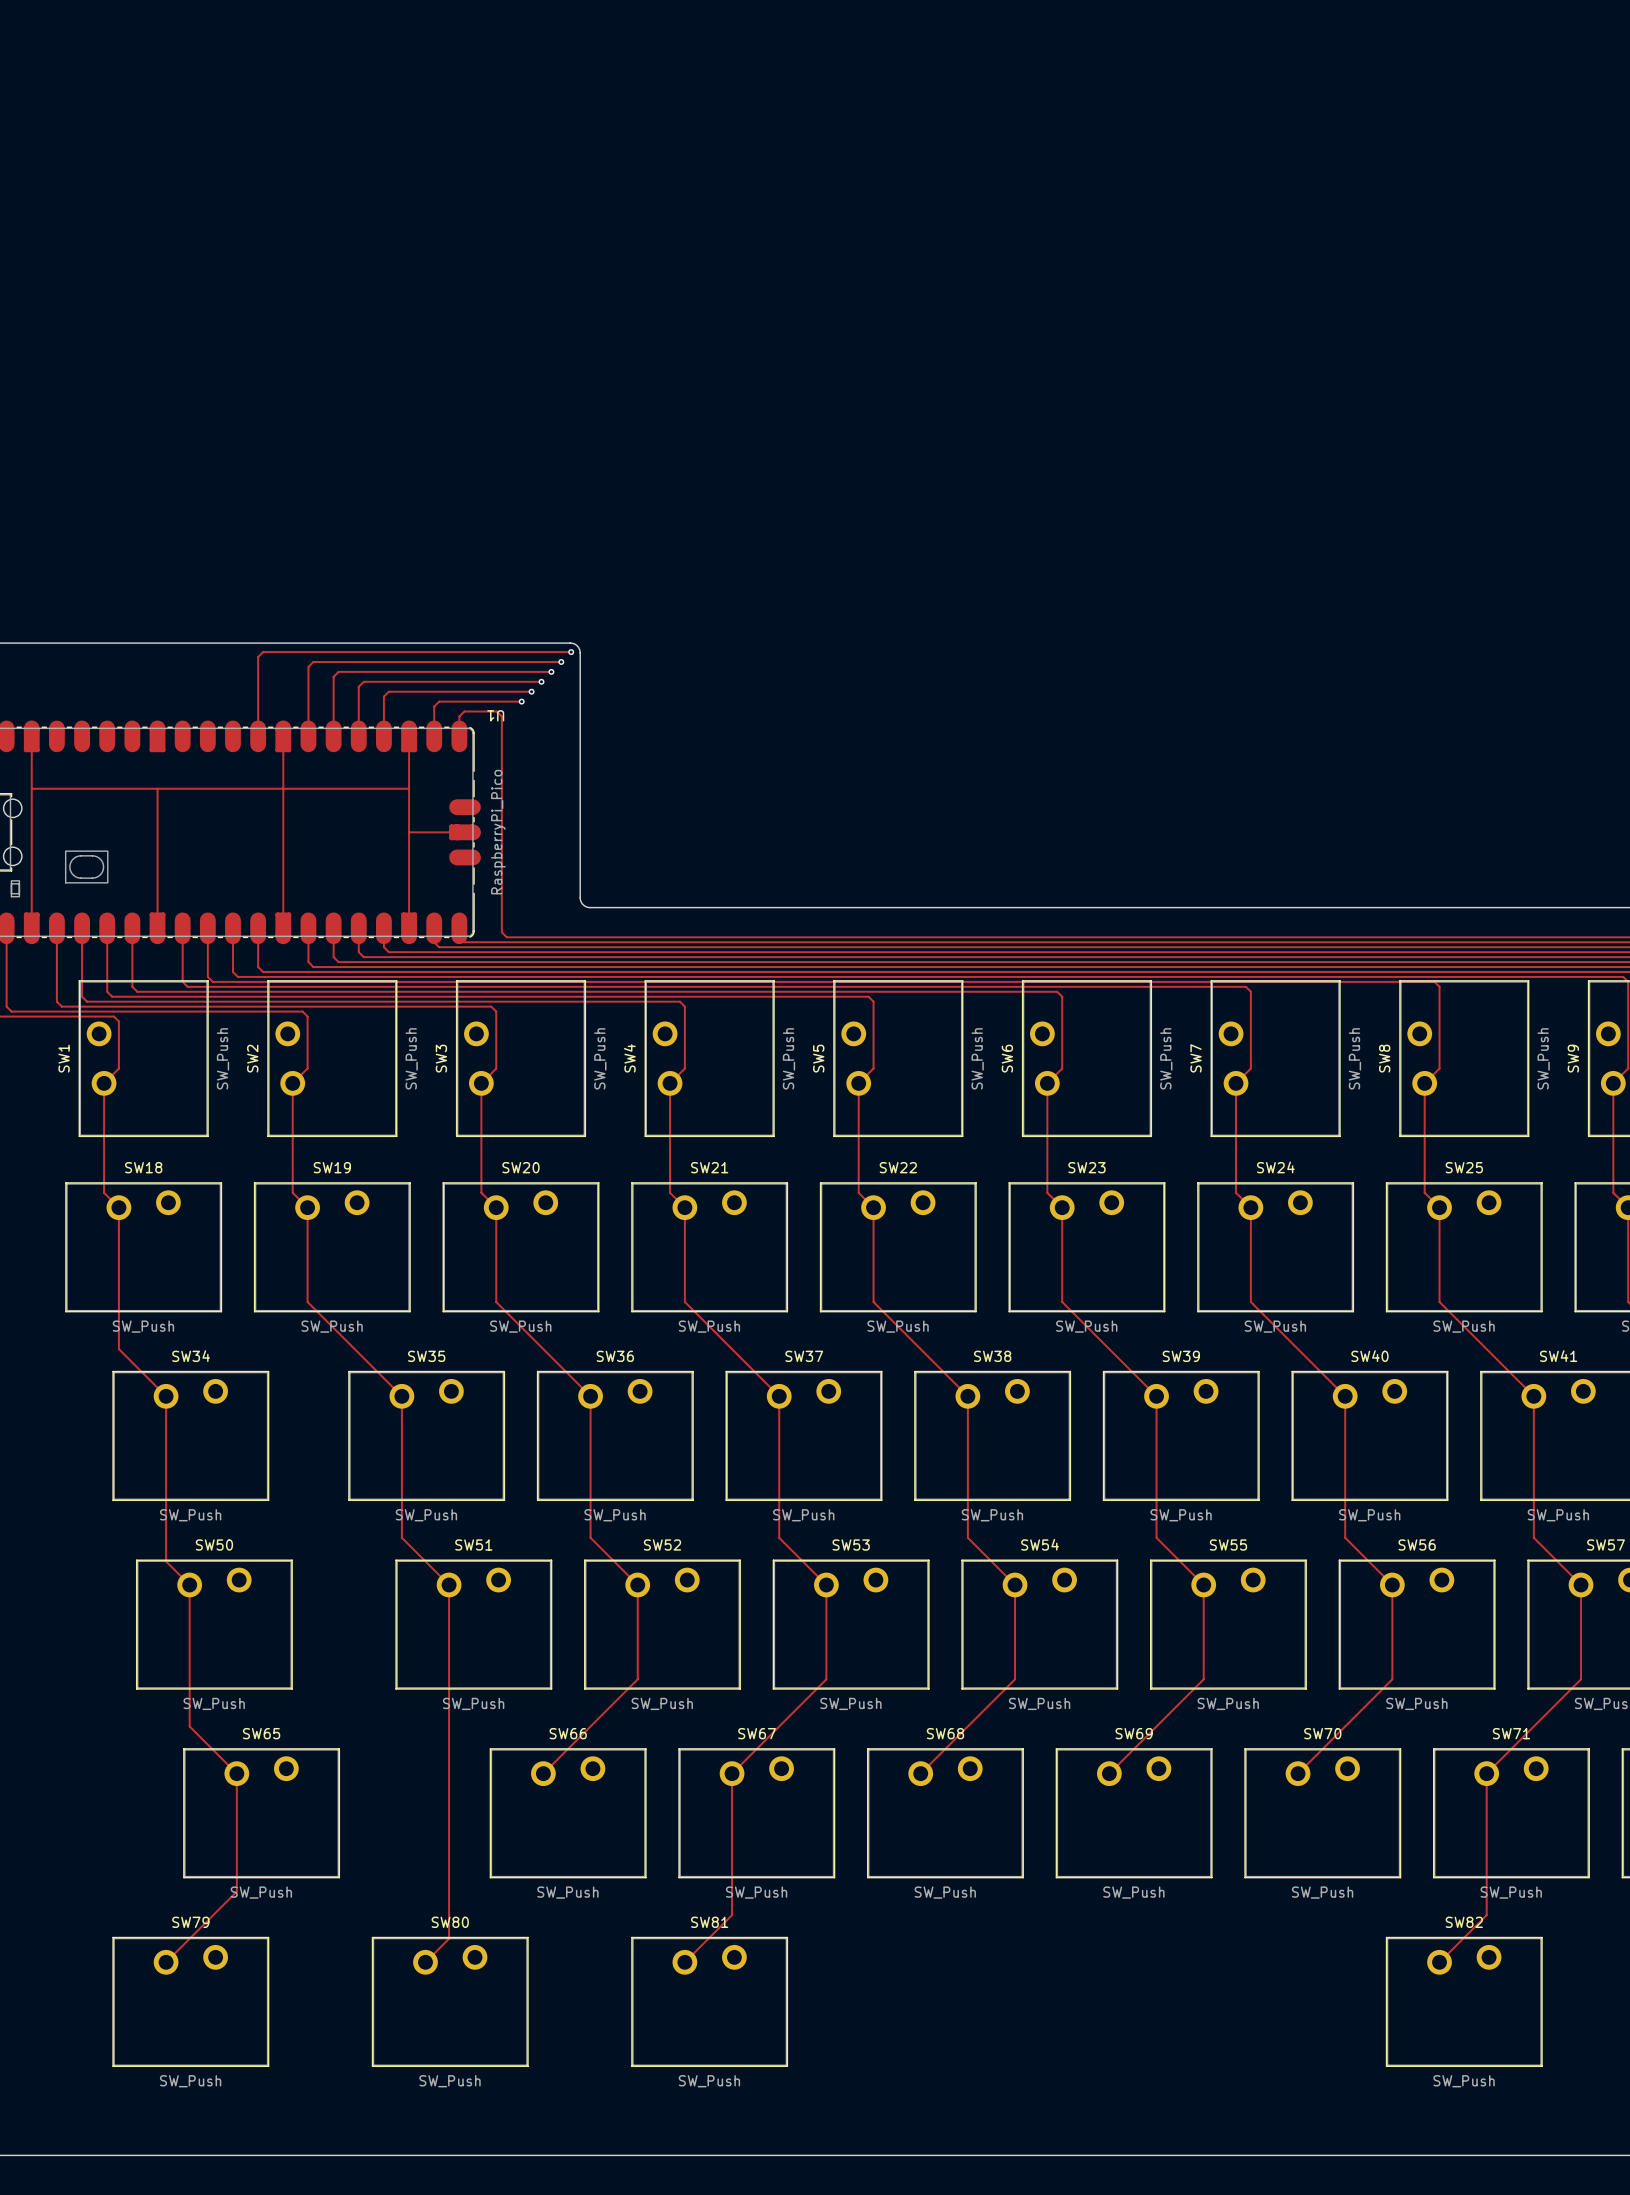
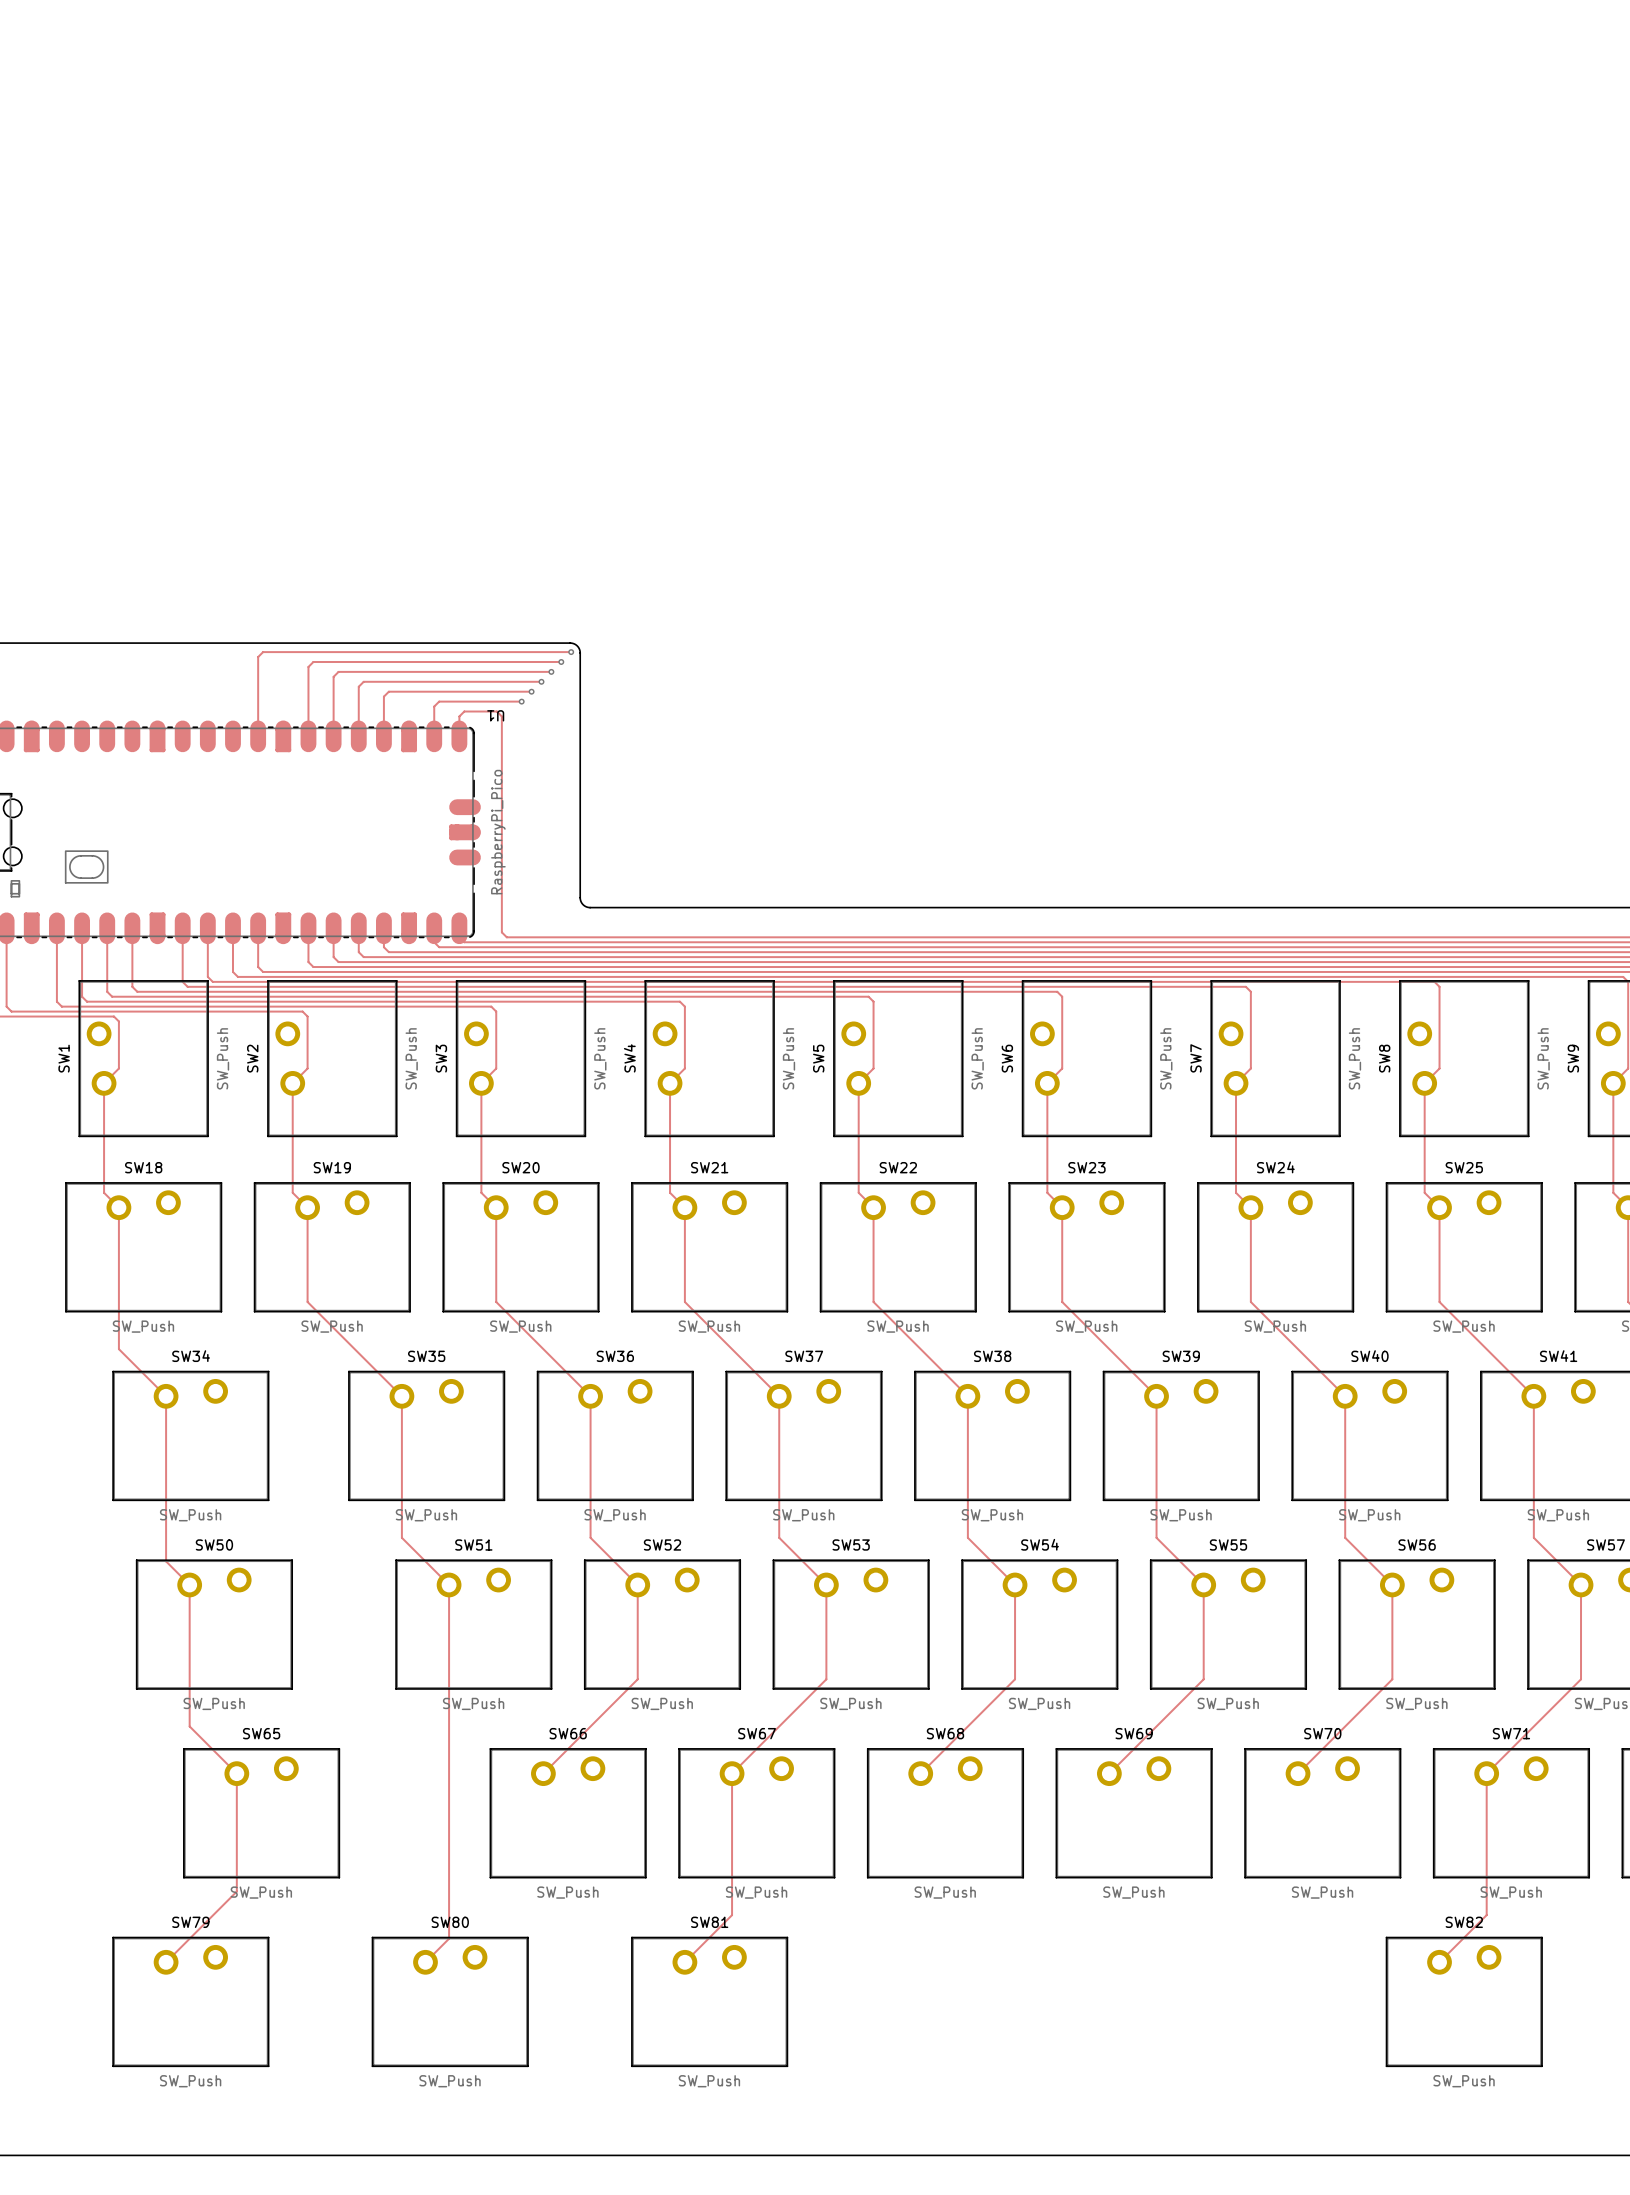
track: (31, 736) (31, 928) -> none
track: (283, 736) (283, 928) -> none
track: (409, 736) (409, 928) -> none
track: (31, 788) (409, 788) -> none
track: (157, 788) (157, 928) -> none
track: (409, 832) (457, 832) -> none

